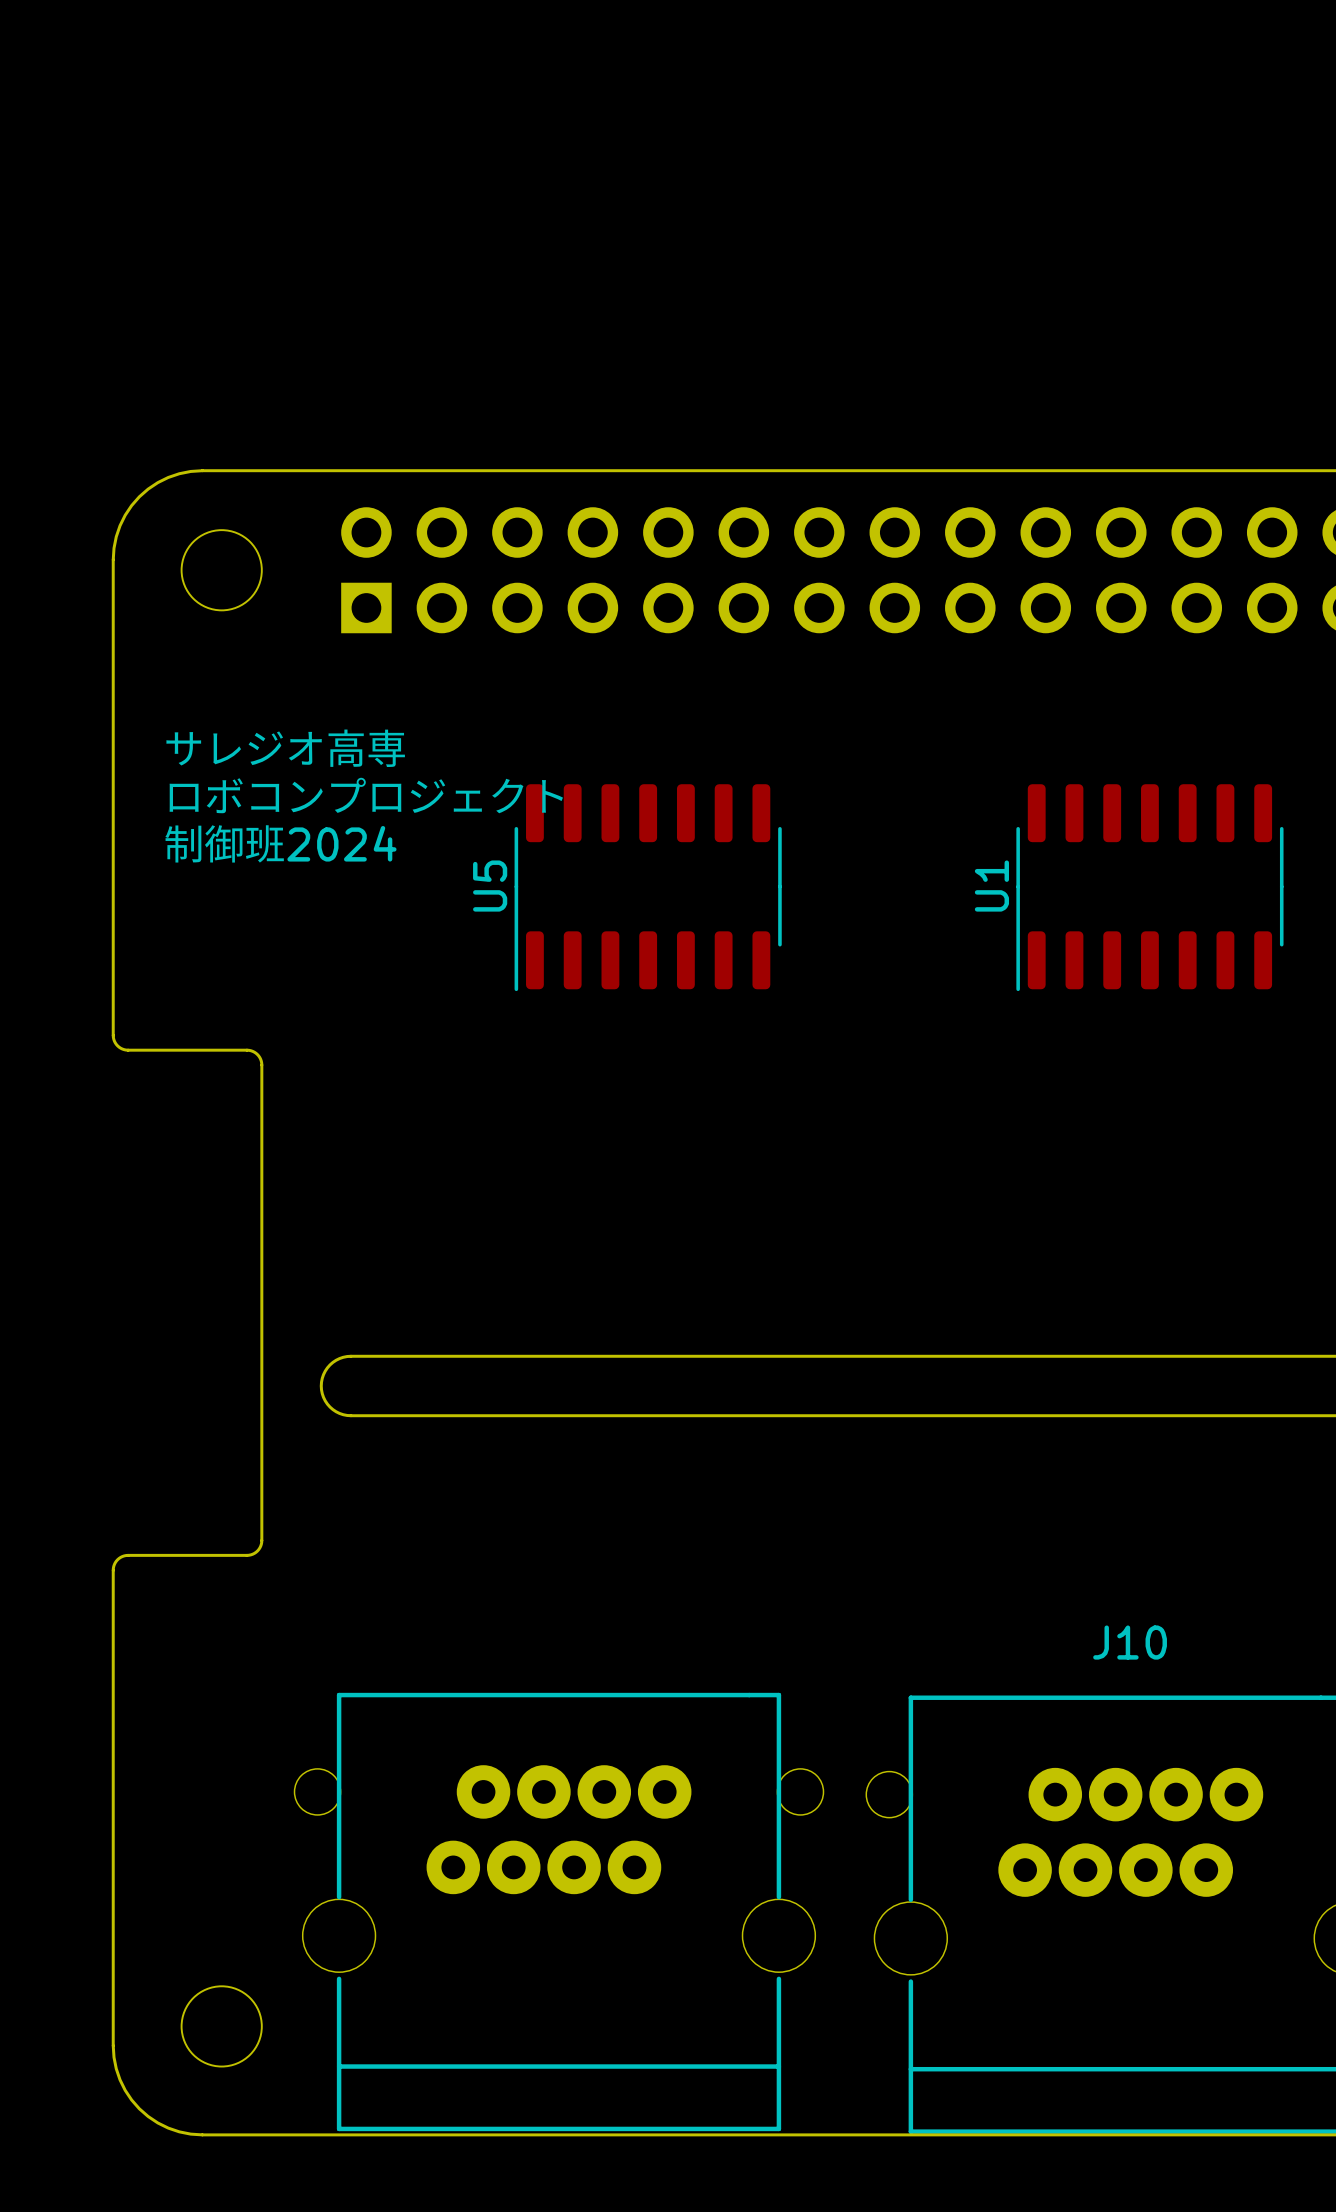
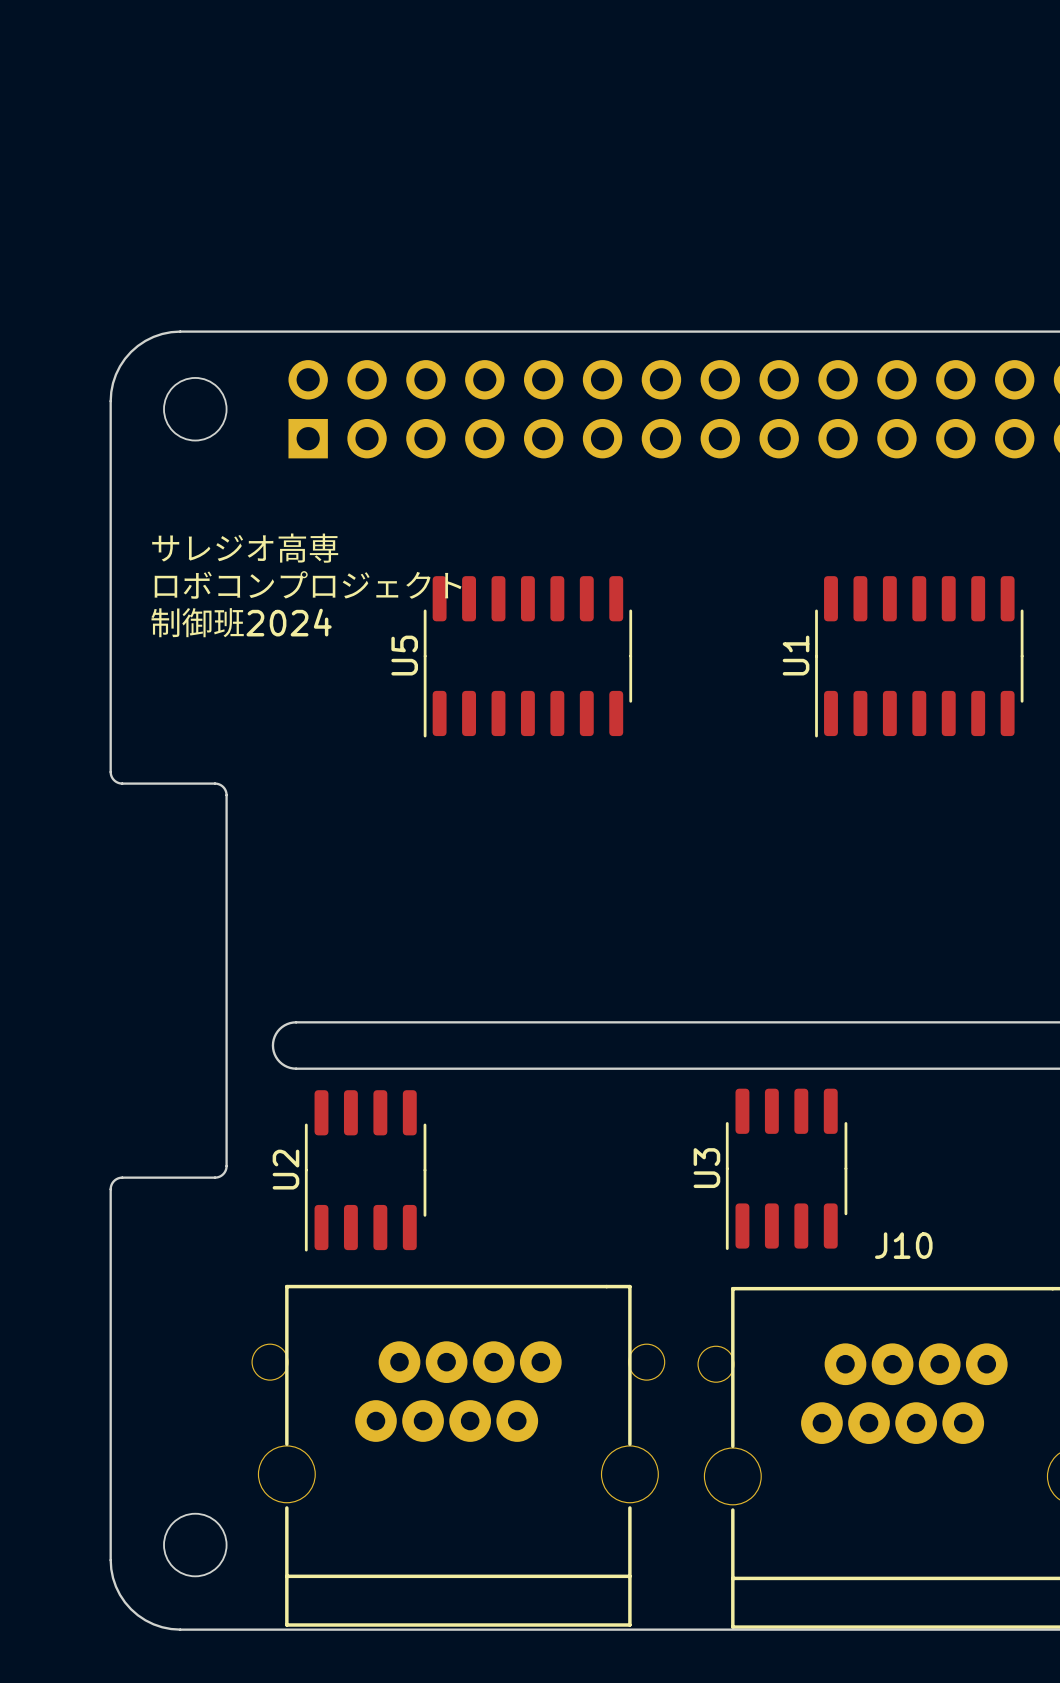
U3: none -> (786, 1169)
U2: none -> (365, 1170)

